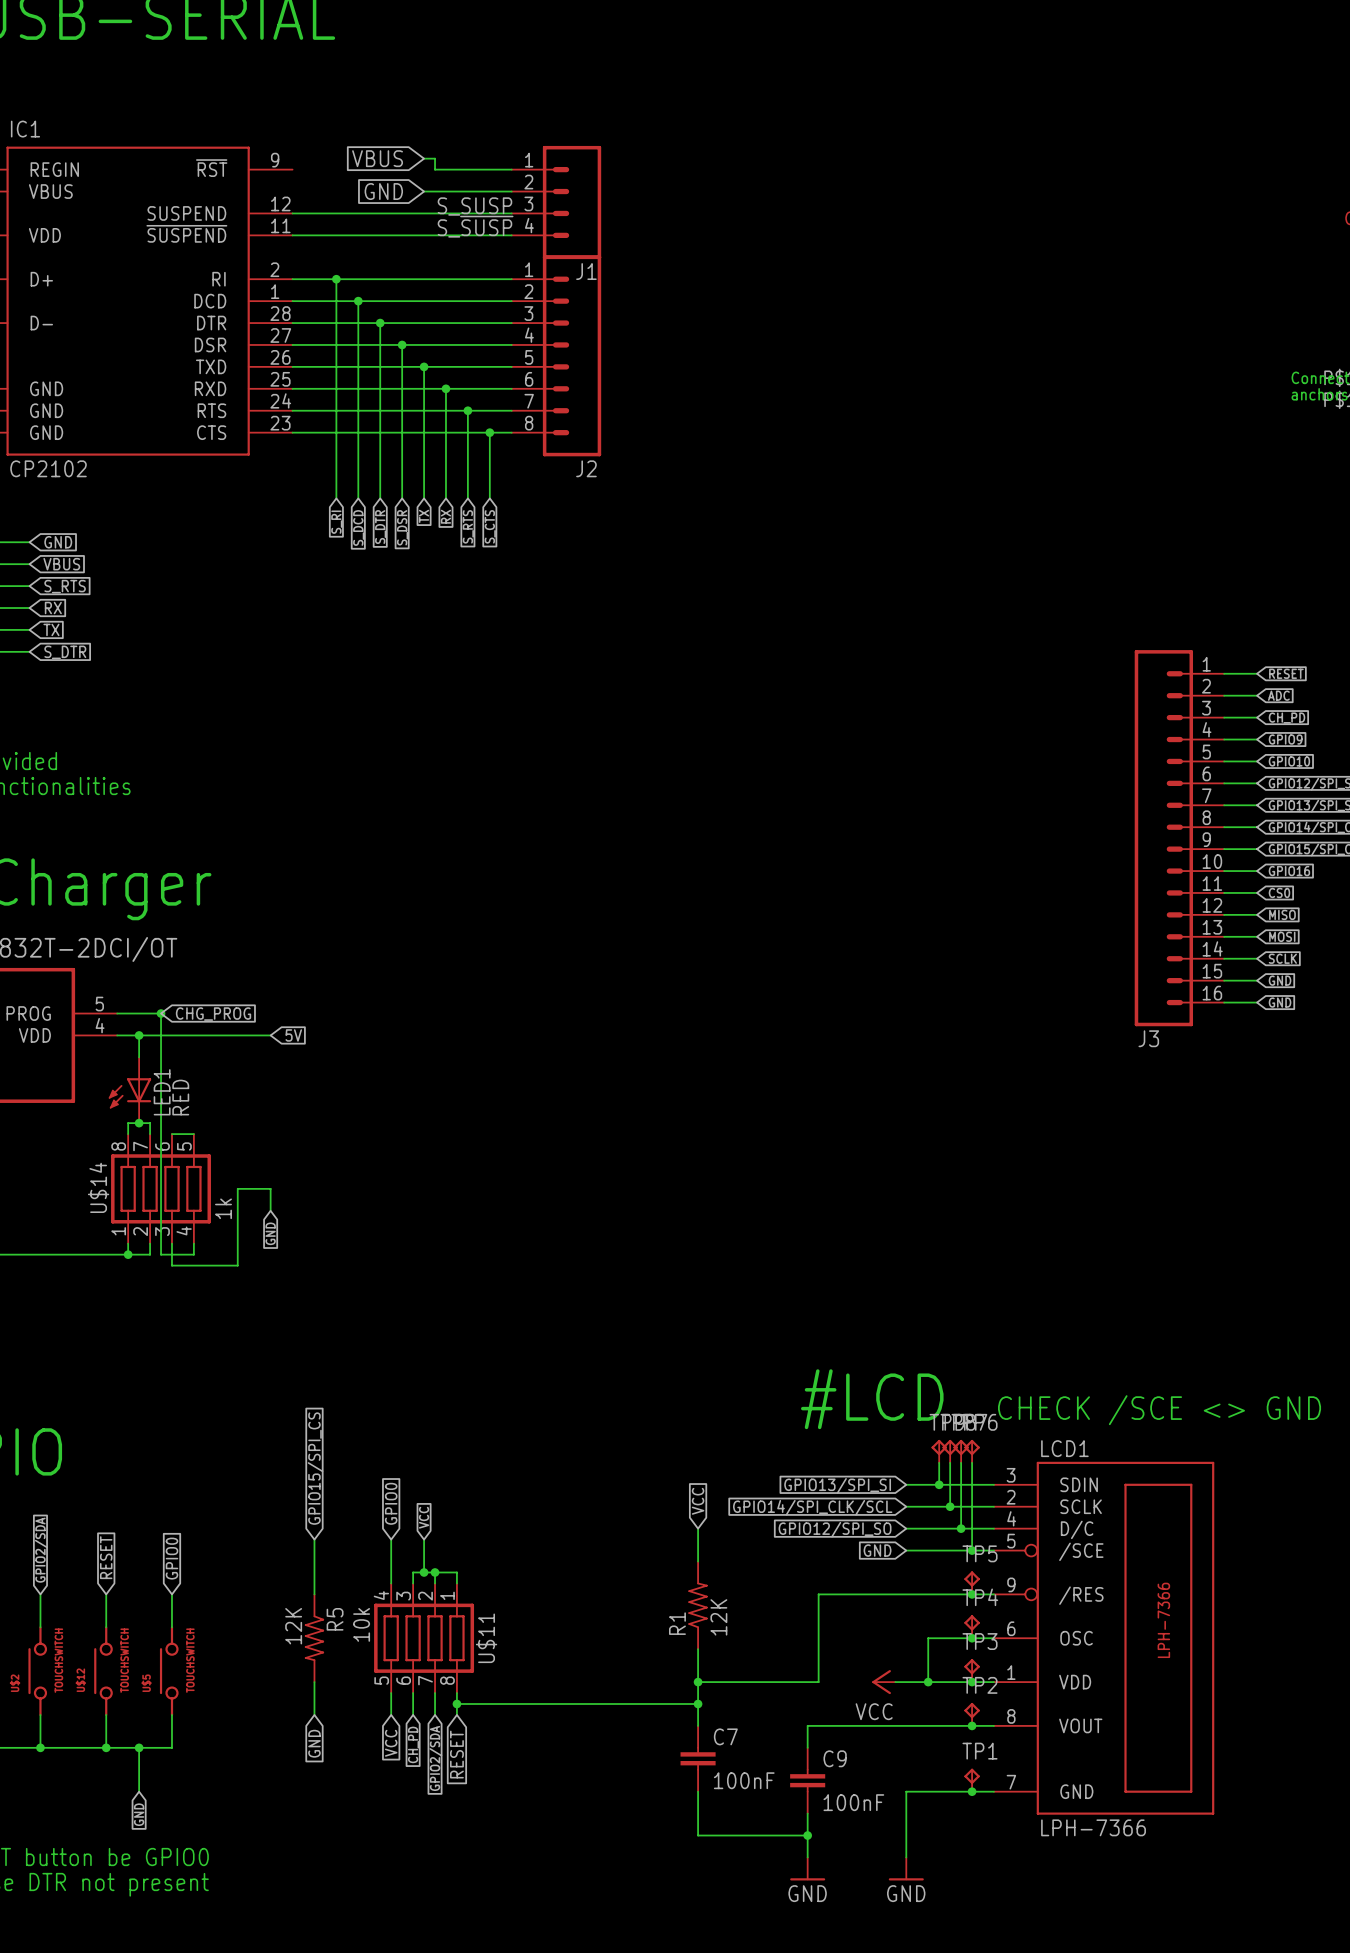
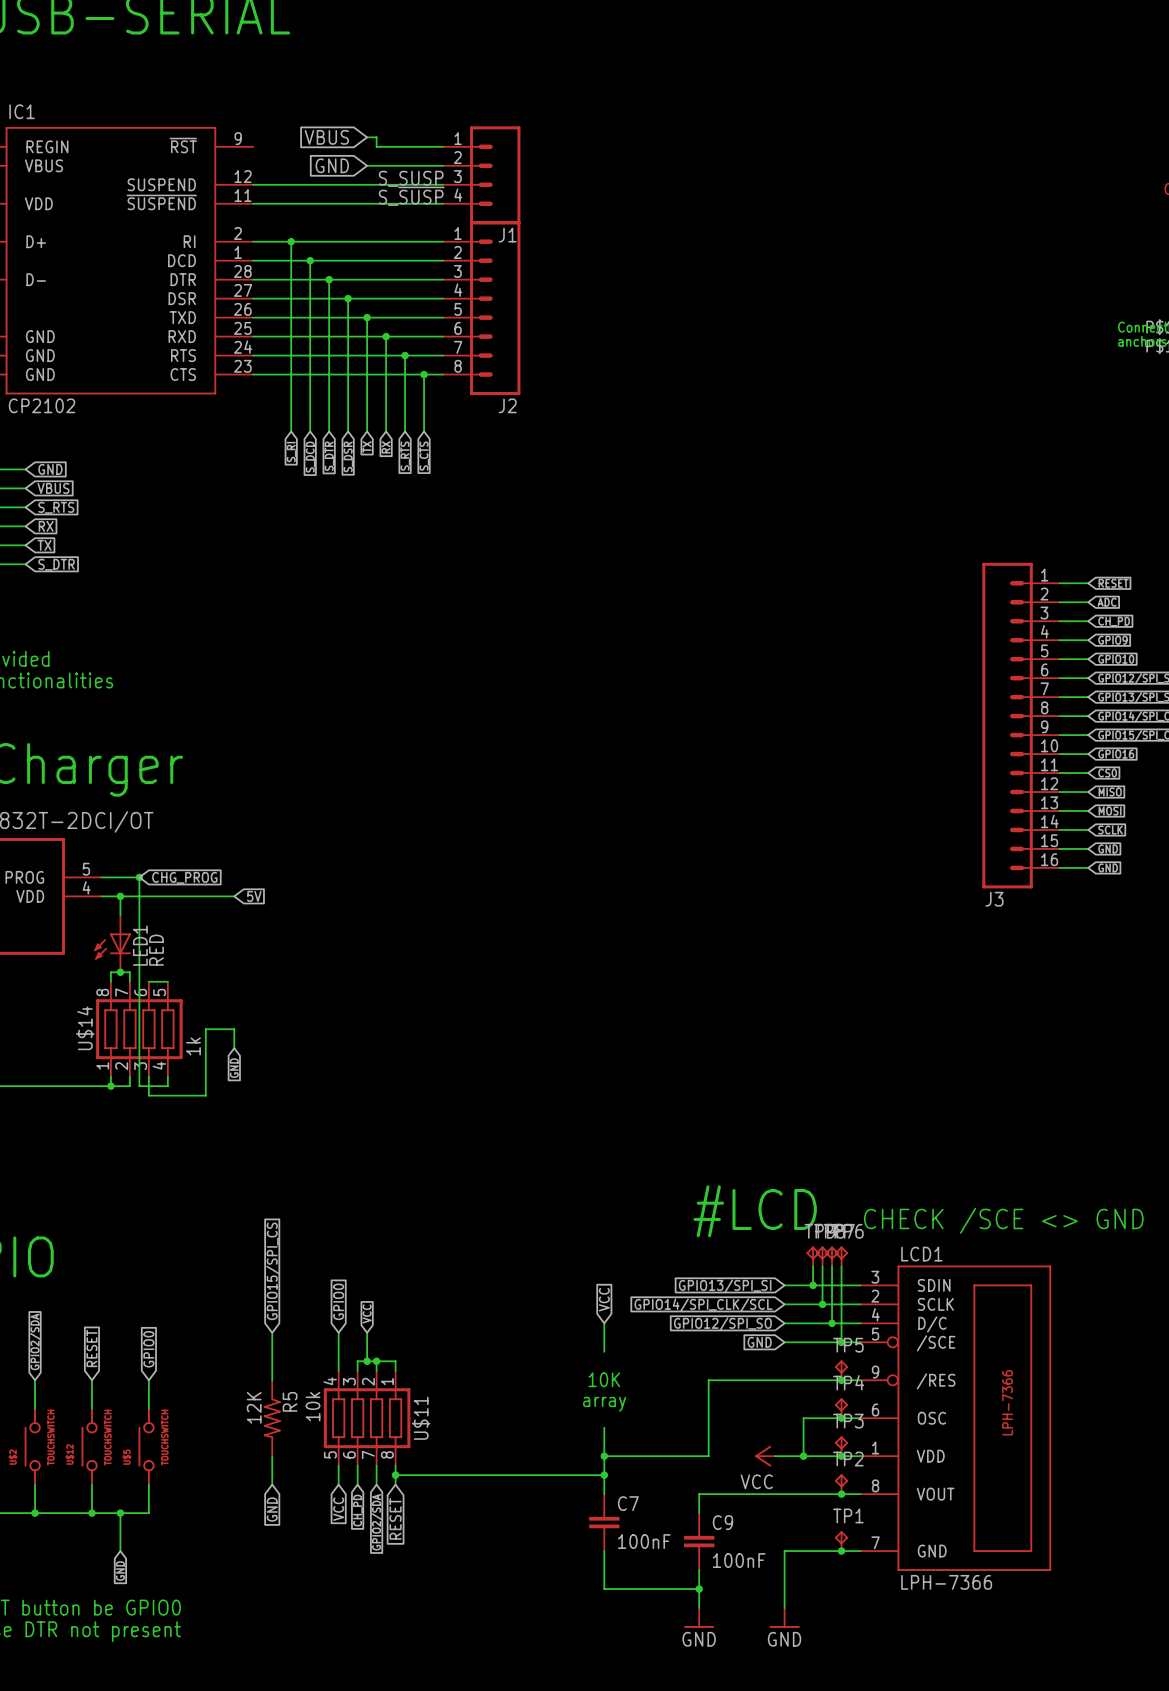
text: none -> 10K (604, 1379)
R1: 12K (698, 1605) -> none
text: none -> array (604, 1404)

